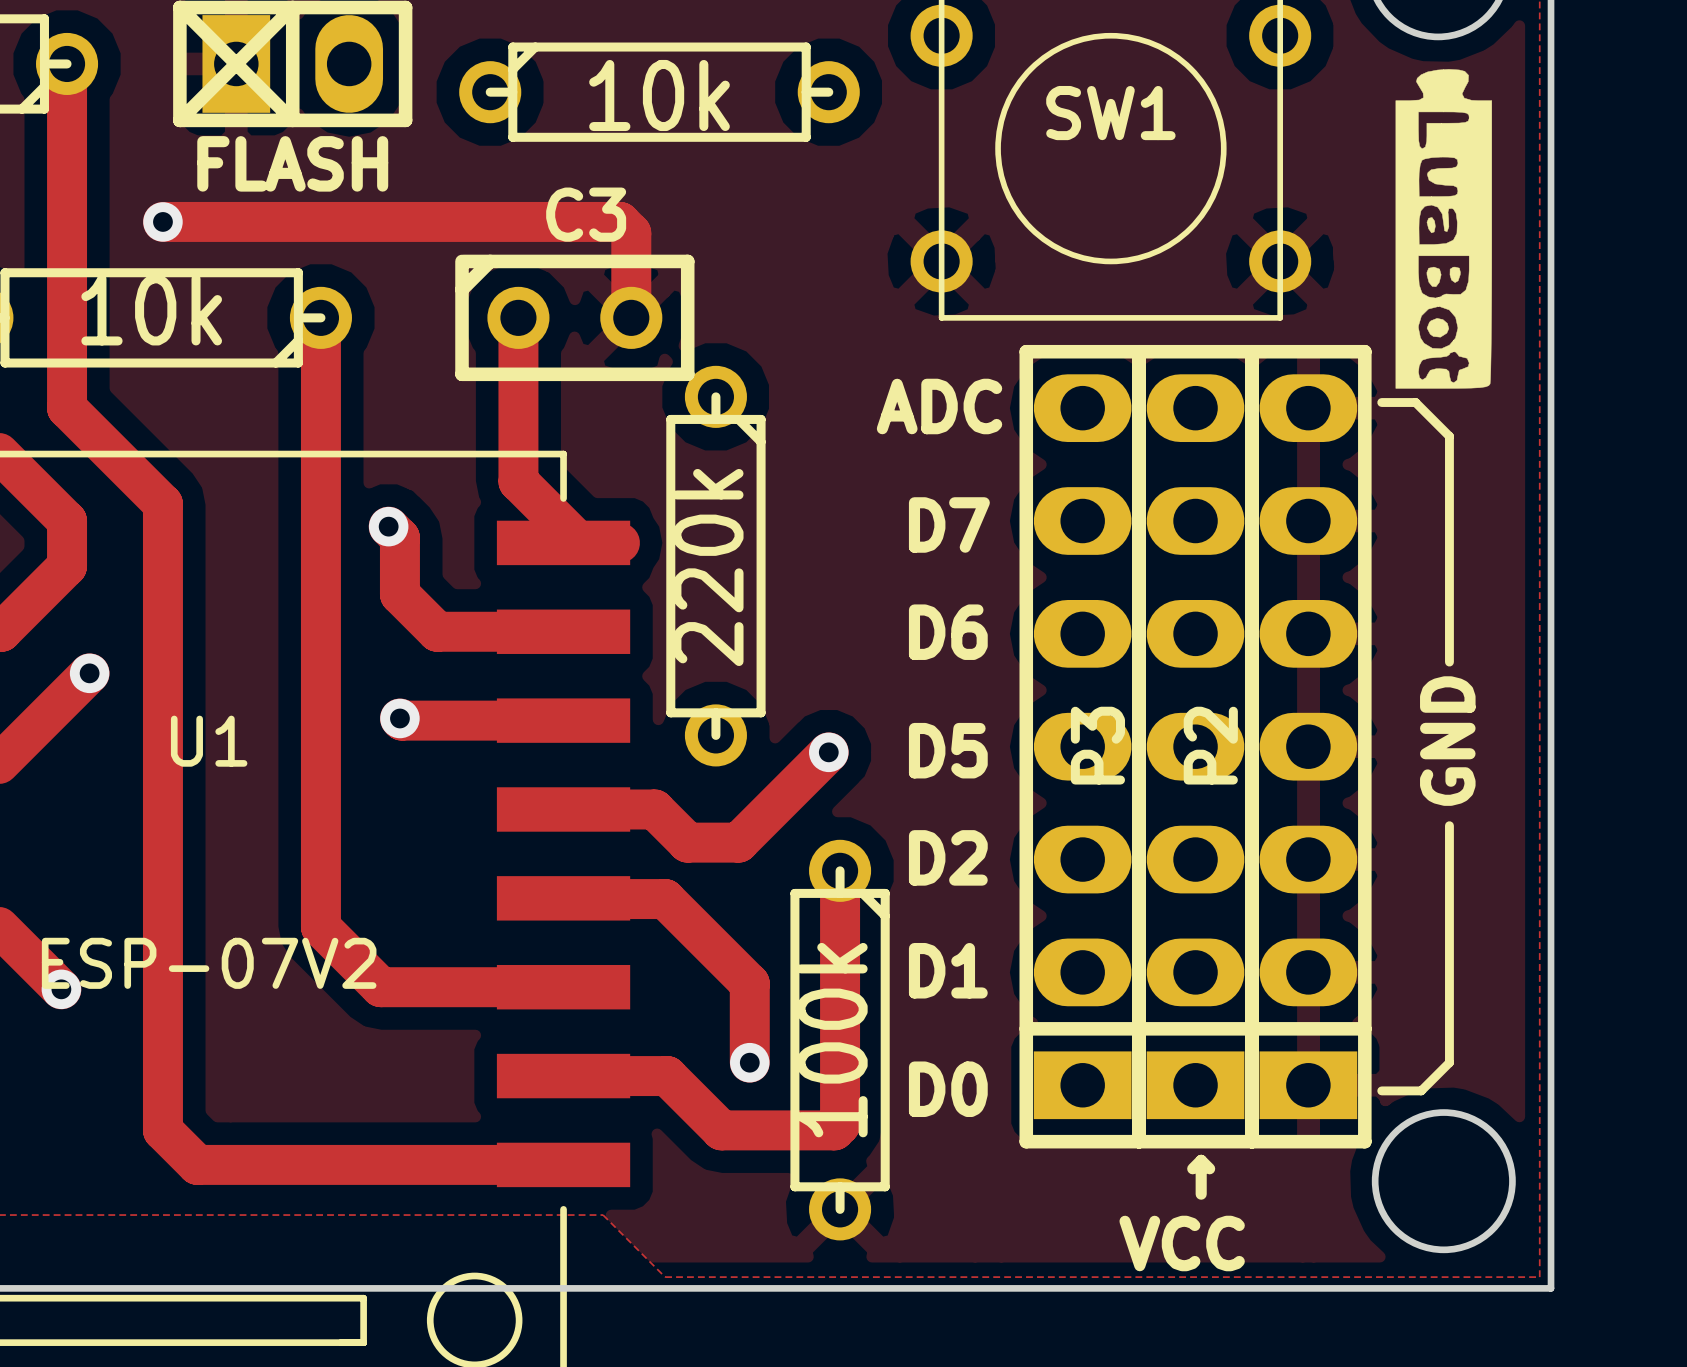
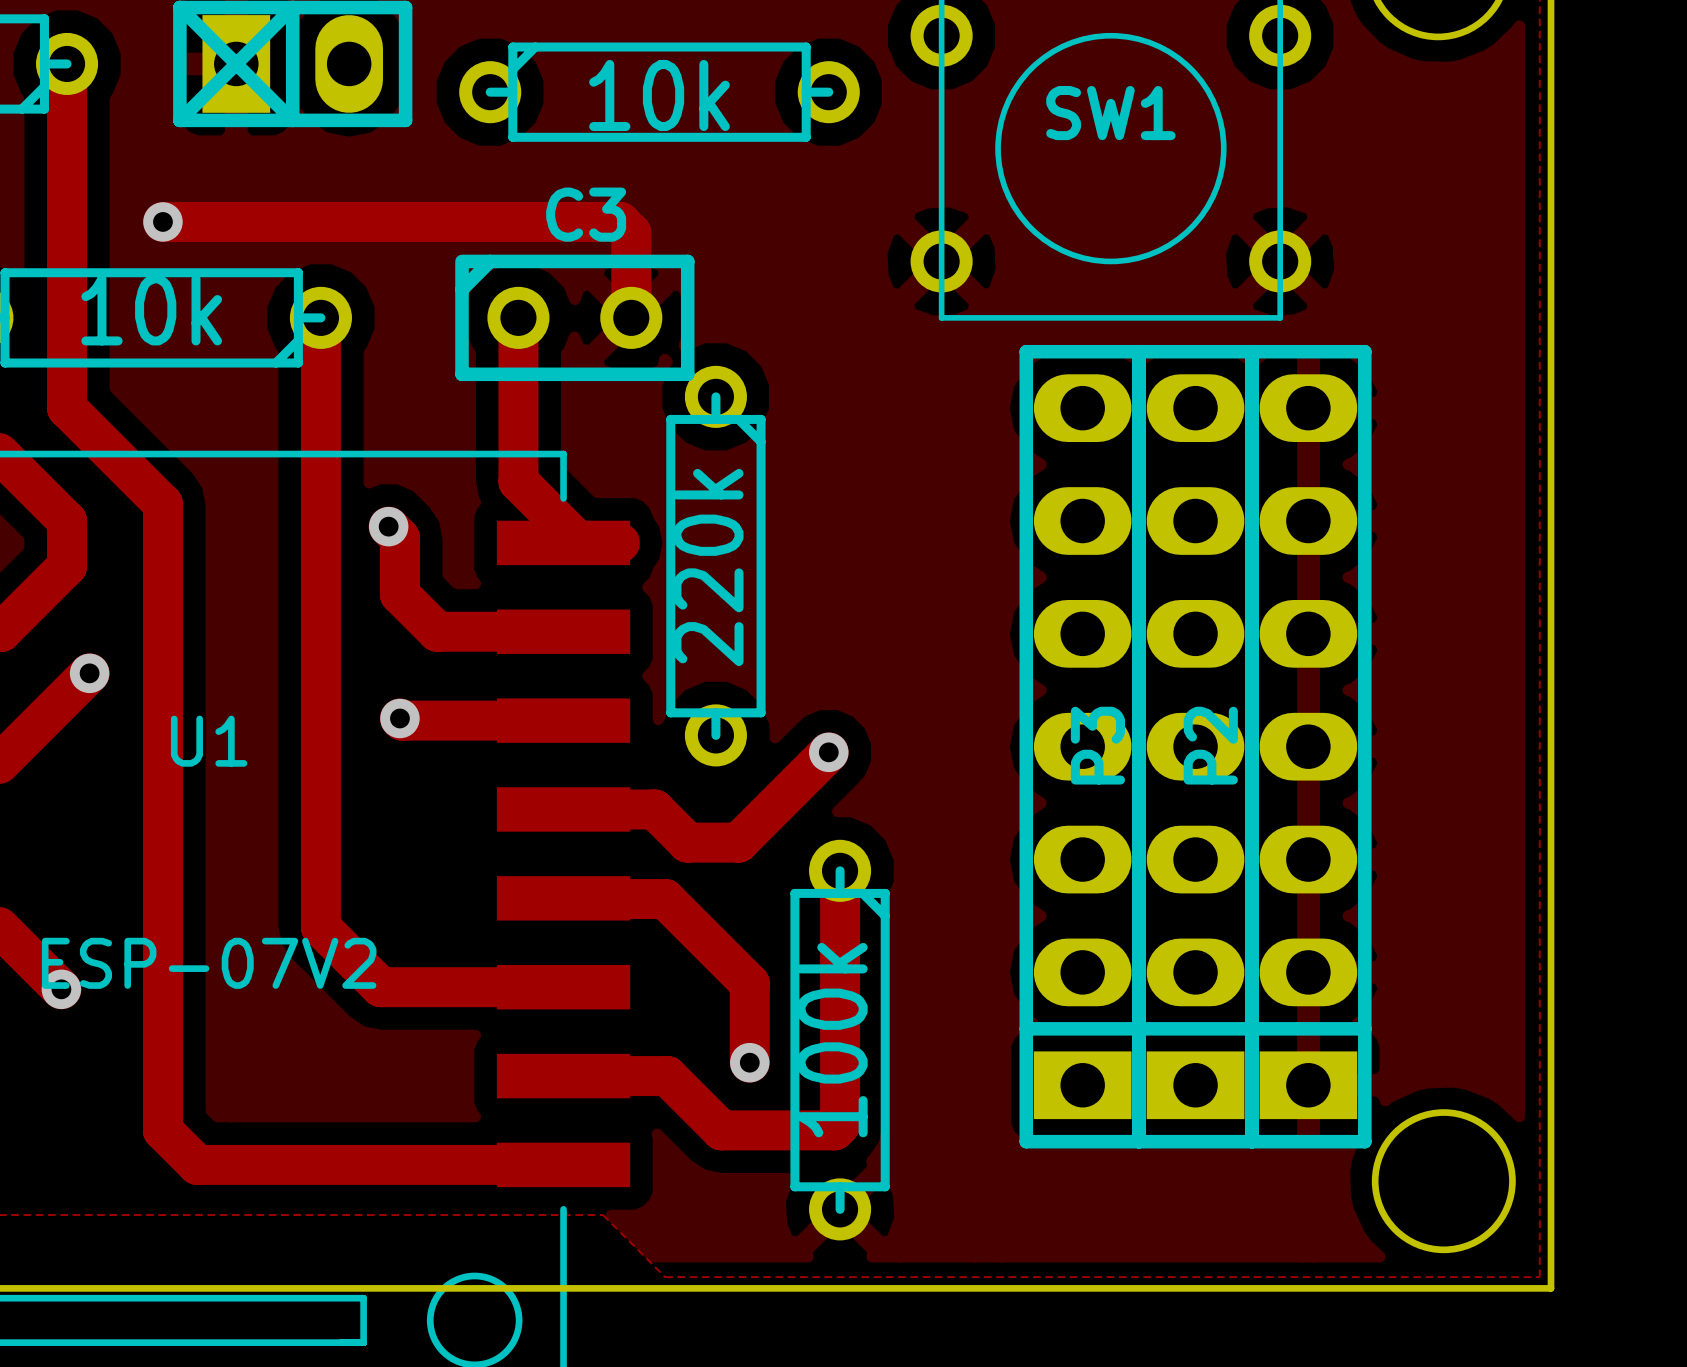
drawing: [1395, 69, 1493, 389] -> none
text: FLASH (292, 163) -> none
line: (1381, 402) (1415, 402) (1449, 436) (1449, 662) -> none
text: ADC (939, 406) -> none
text: D7 (949, 524) -> none
text: D6 (948, 632) -> none
text: GND (1447, 741) -> none
text: D5 (948, 750) -> none
line: (1449, 825) (1449, 1062) (1421, 1090) (1381, 1090) -> none
text: D2 (948, 857) -> none
text: D1 (948, 970) -> none
text: D0 (948, 1089) -> none
text: ↑ (1201, 1177) -> none
text: VCC (1182, 1243) -> none

